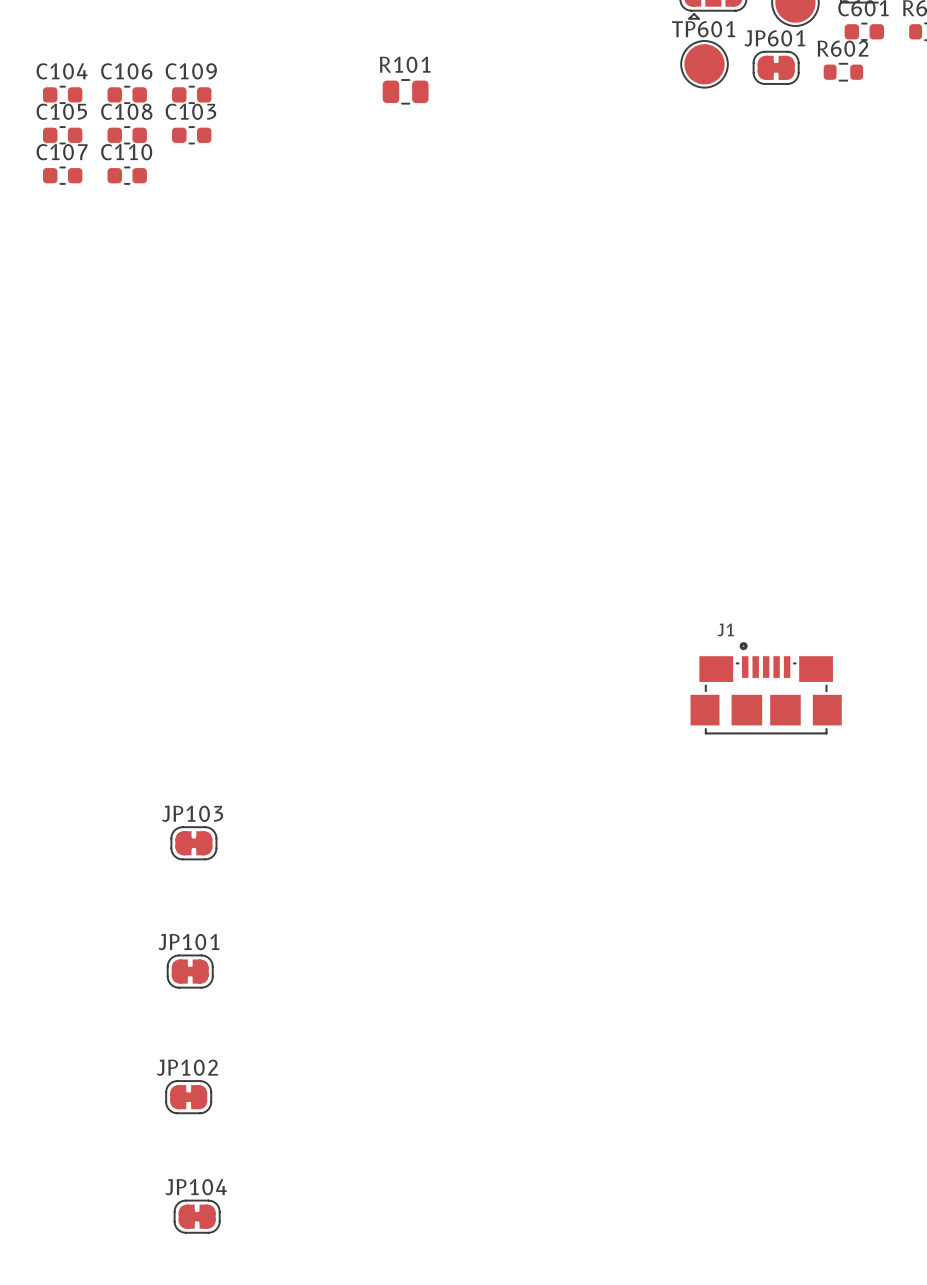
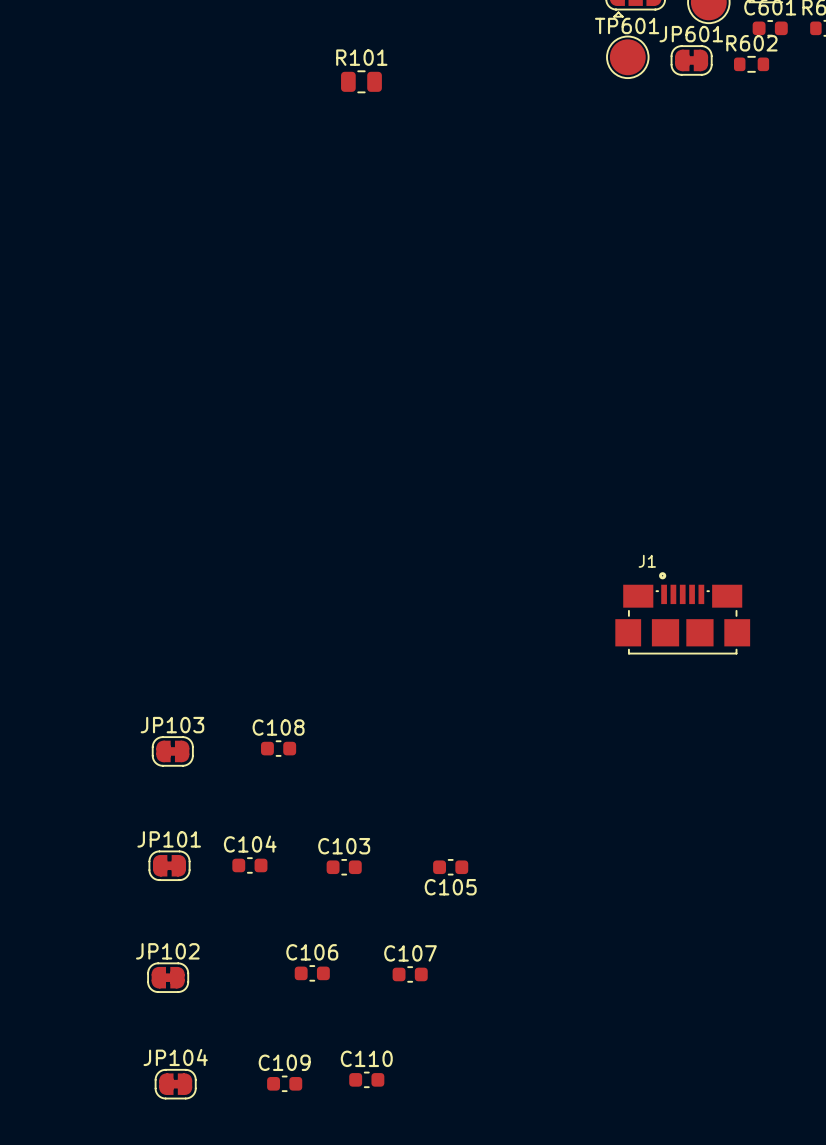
C104 position: (62, 94) -> (249, 865)
C106 position: (127, 94) -> (312, 973)
C109 position: (191, 94) -> (284, 1083)
C105 name position: C105 (61, 111) -> C105 (450, 887)
C105 position: (62, 135) -> (450, 867)
C108 position: (127, 135) -> (278, 748)
C103 position: (191, 135) -> (344, 867)
C107 position: (62, 175) -> (410, 974)
C110 position: (127, 175) -> (366, 1079)

